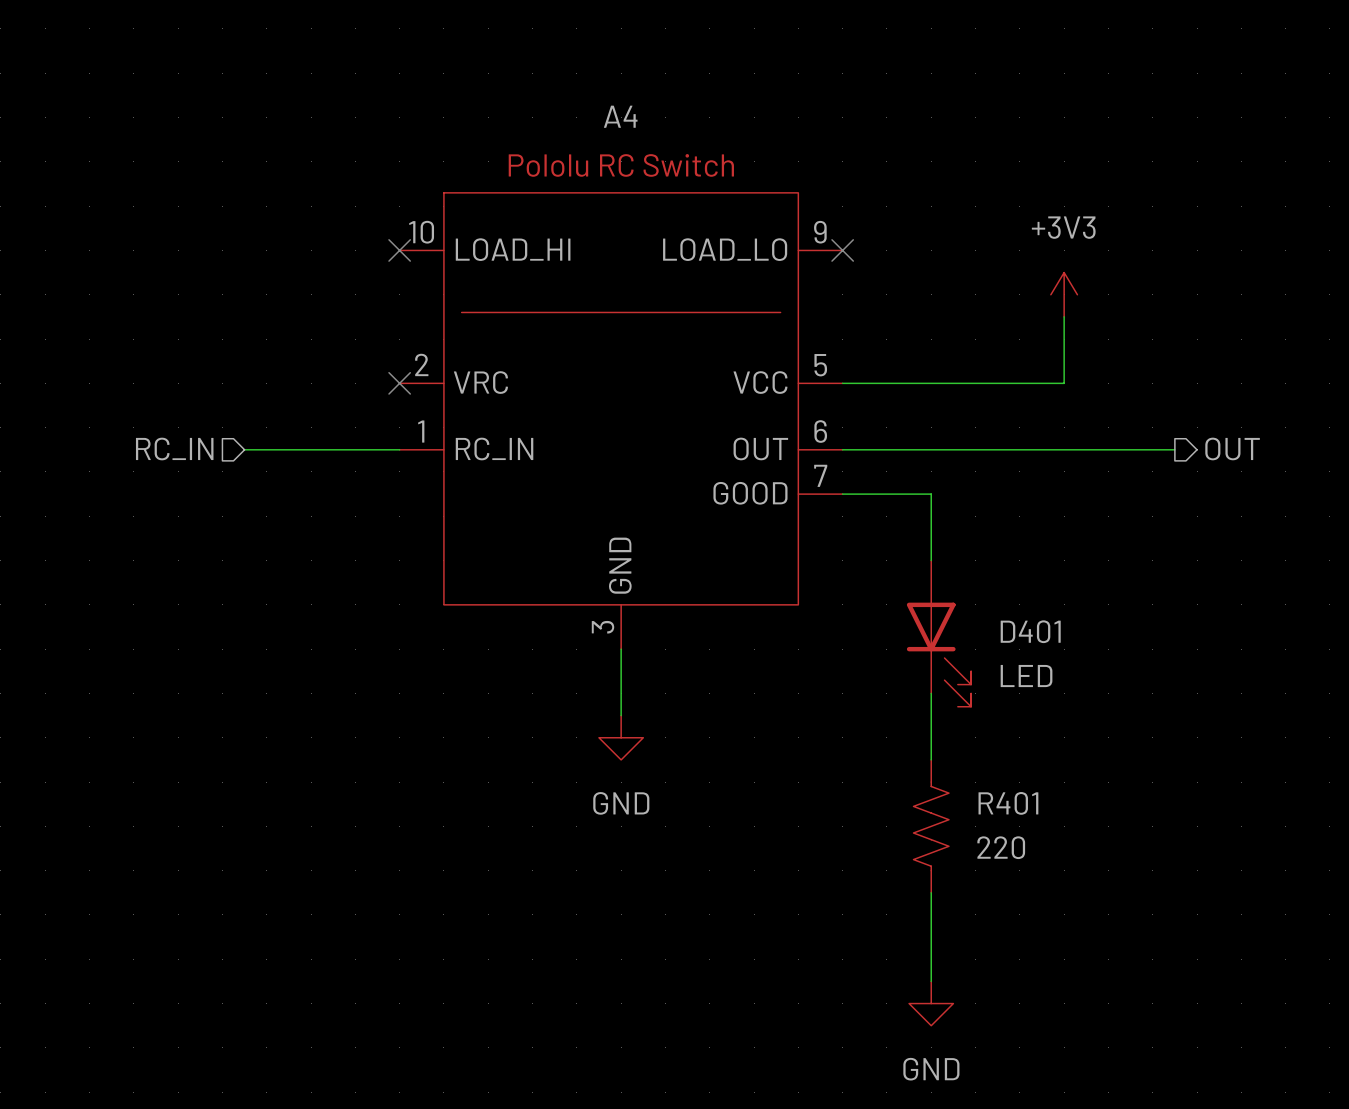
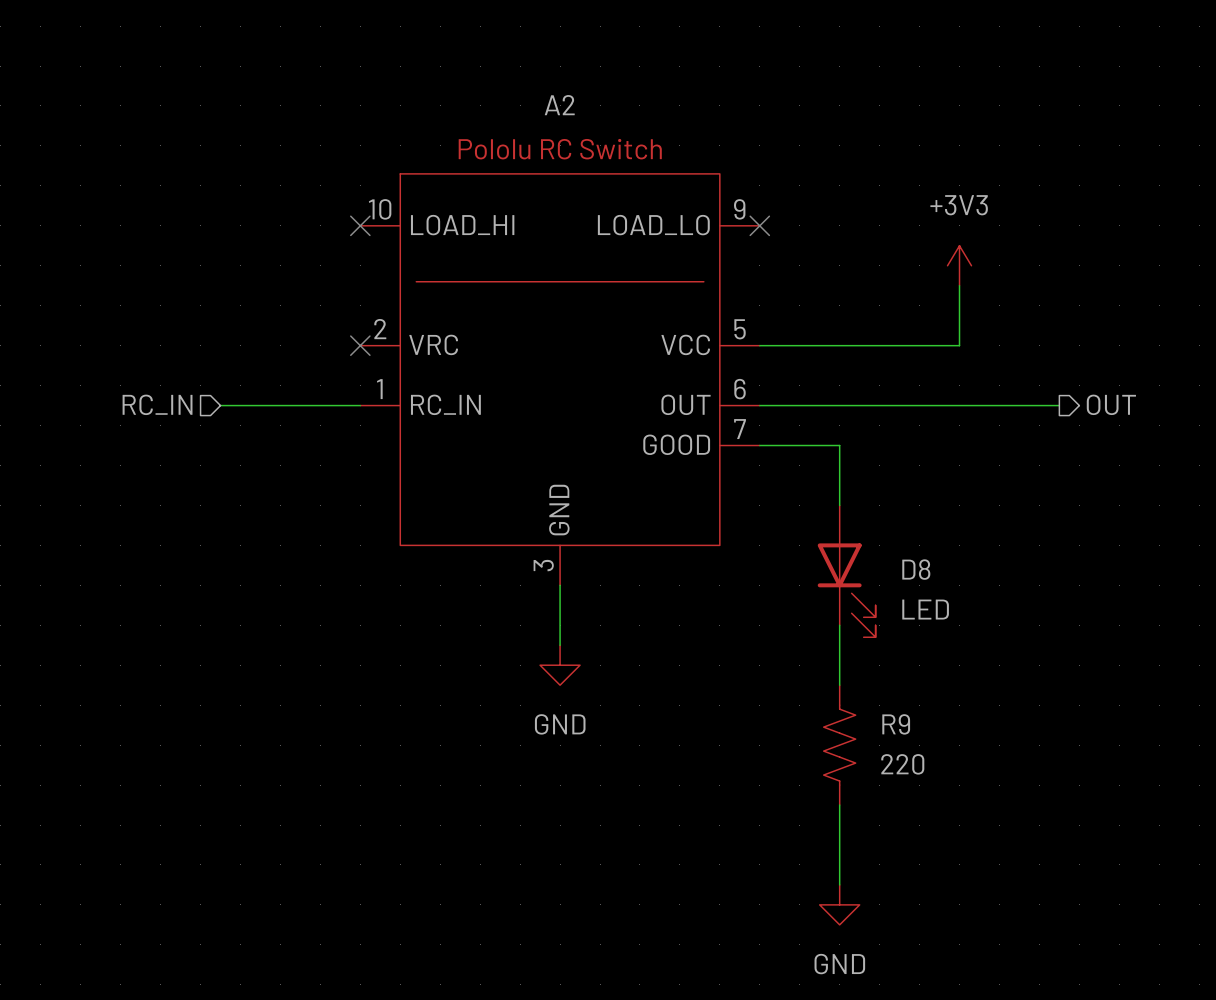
A4 name: A4 (620, 116) -> A2 (559, 105)
D401 name: D401 (1030, 631) -> D8 (916, 569)
R401 name: R401 (1008, 803) -> R9 (896, 724)

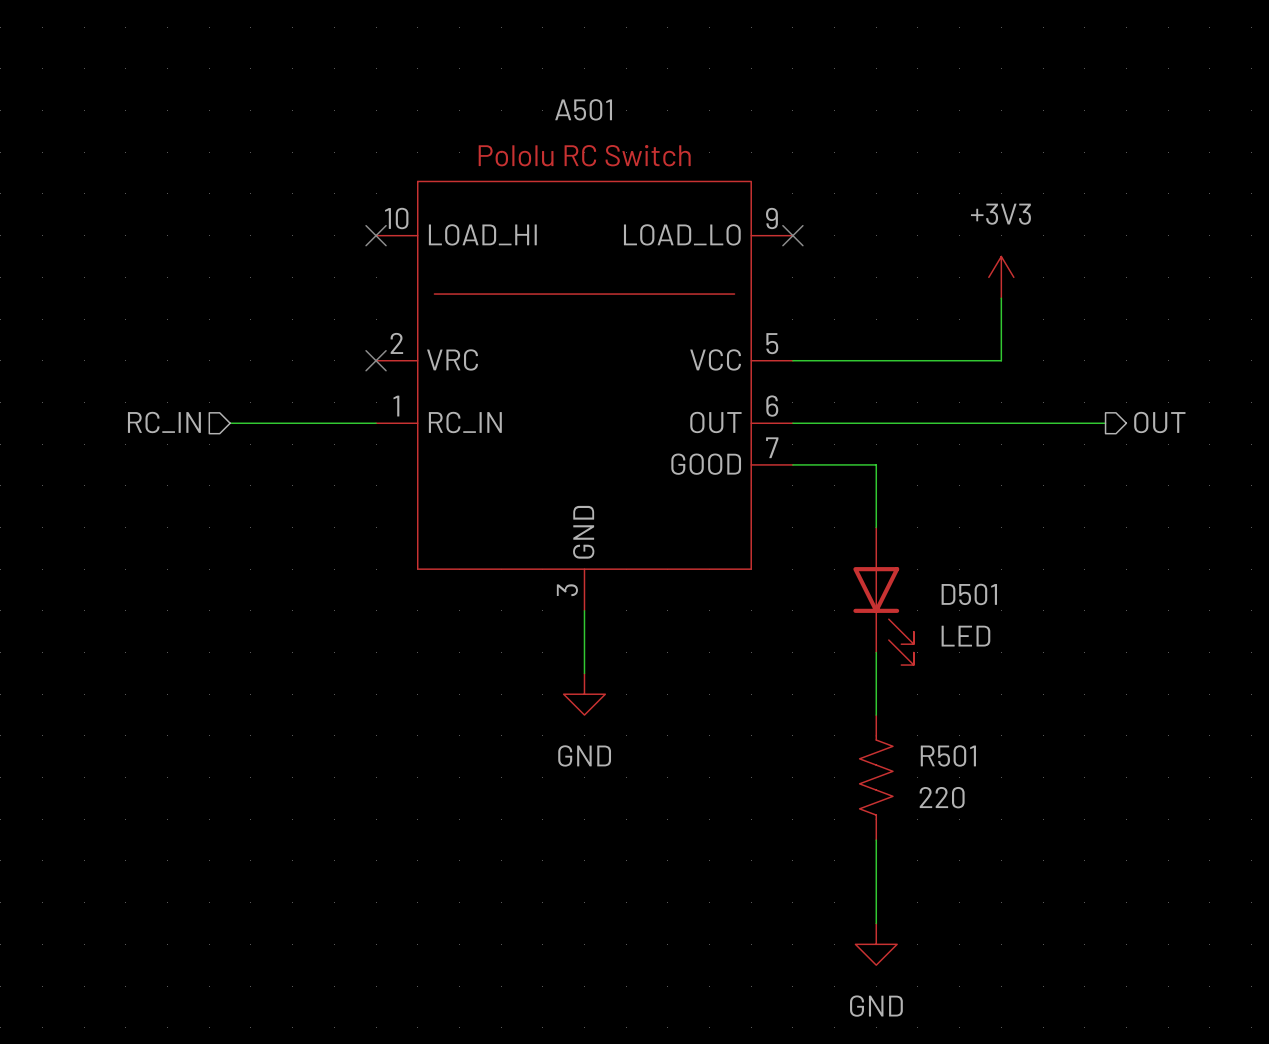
A2 name: A2 (559, 105) -> A501 (583, 109)
D8 name: D8 (916, 569) -> D501 (969, 594)
R9 name: R9 (896, 724) -> R501 (948, 755)

